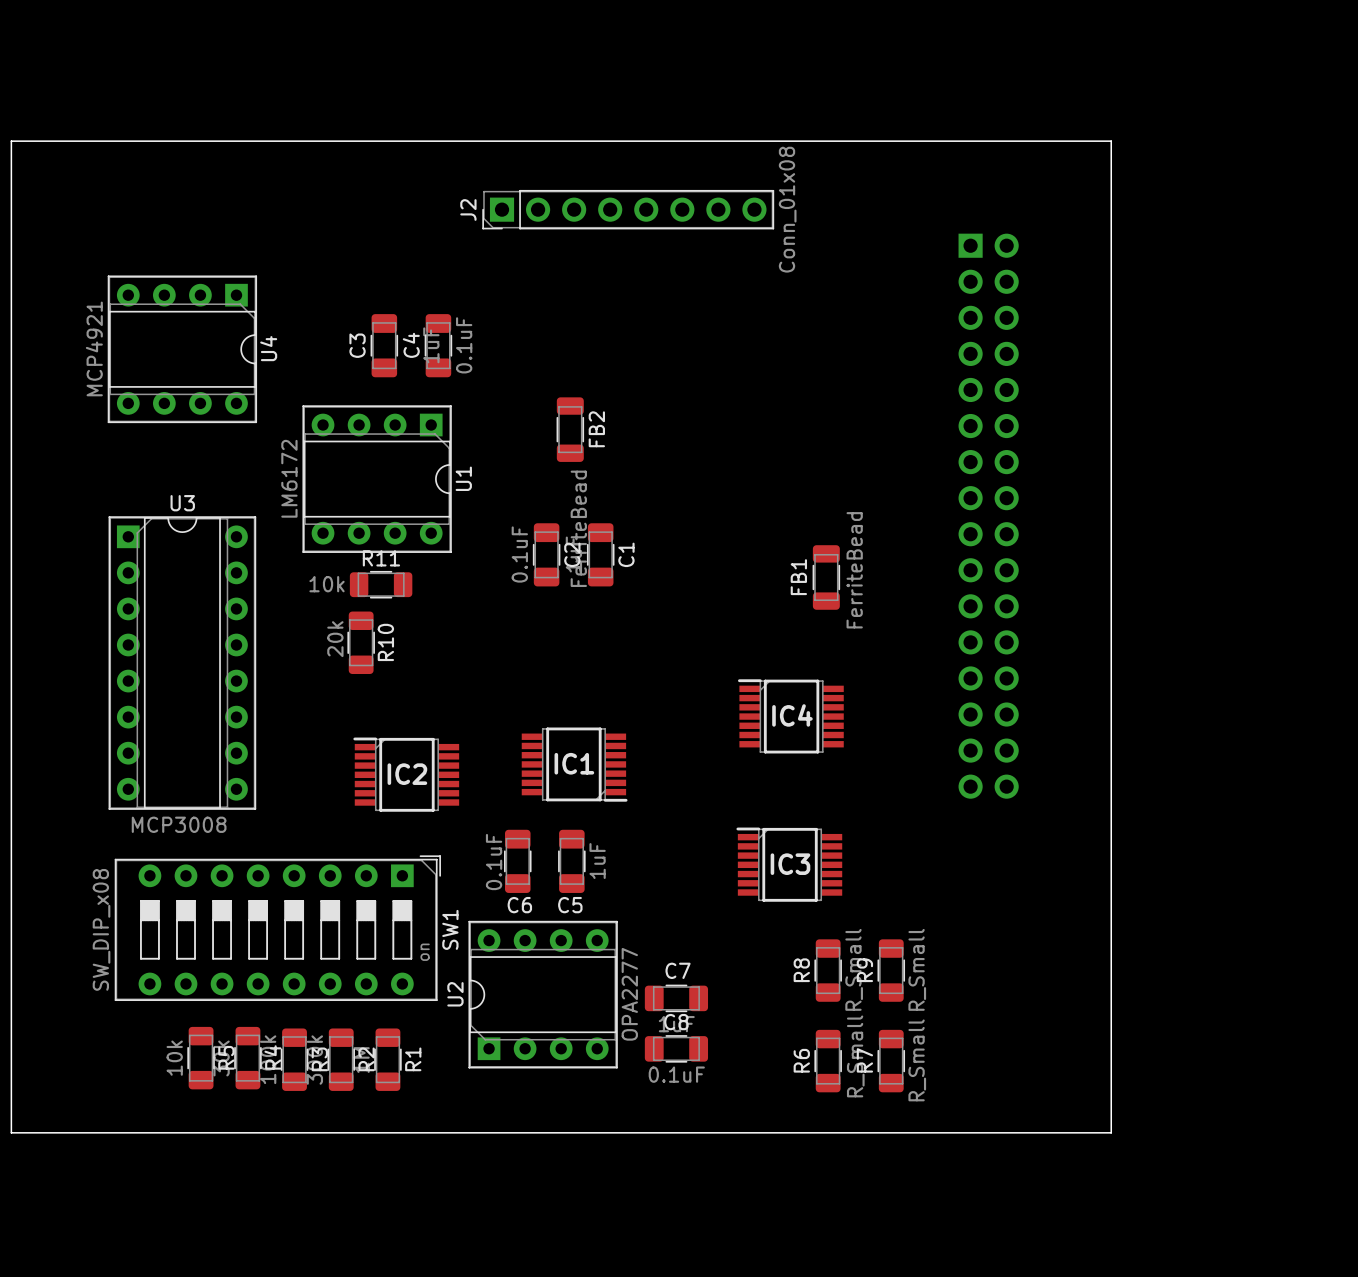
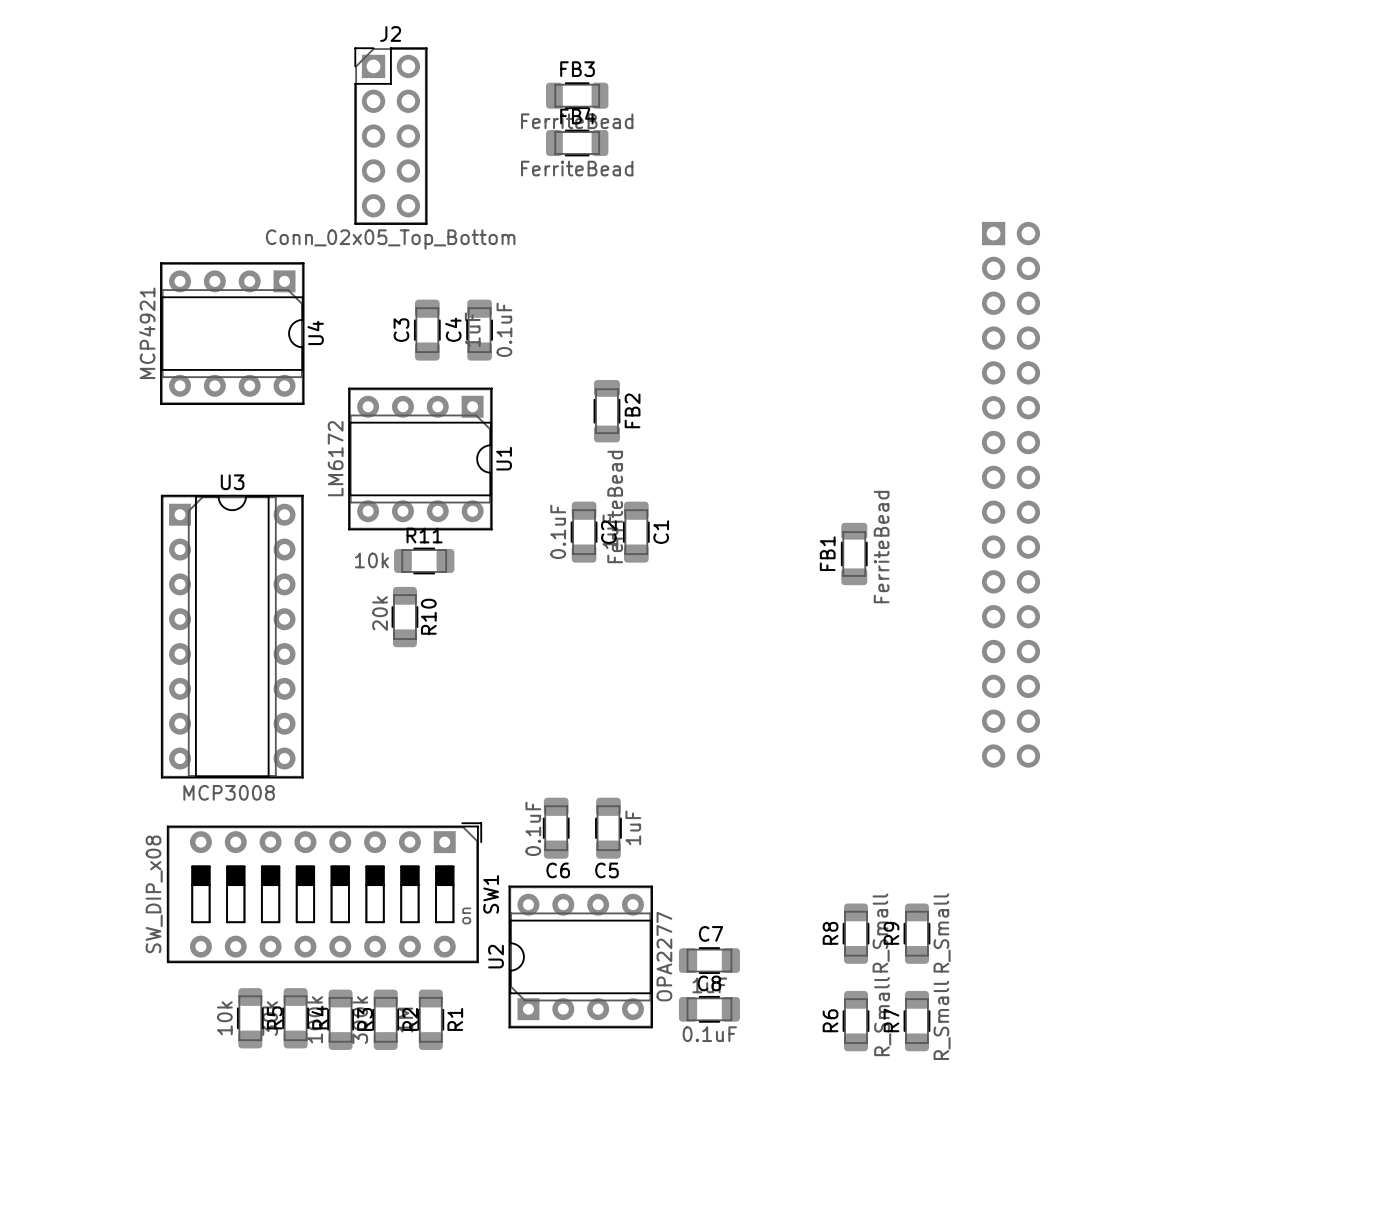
FB3: none -> FerriteBead (577, 95)
board edge: (11, 141) (1111, 141) (1111, 1132) (11, 1132) (11, 141) -> none
FB4: none -> FerriteBead (577, 143)
J2 footprint: [482, 189, 775, 230] -> [354, 47, 428, 225]
J2 value: Conn_01x08 (787, 209) -> Conn_02x05_Top_Bottom (390, 239)
J2 name position: J2 (468, 210) -> J2 (390, 33)
IC4: (790, 716) -> none
IC1: (574, 764) -> none
IC2: (406, 774) -> none
IC3: (789, 864) -> none

